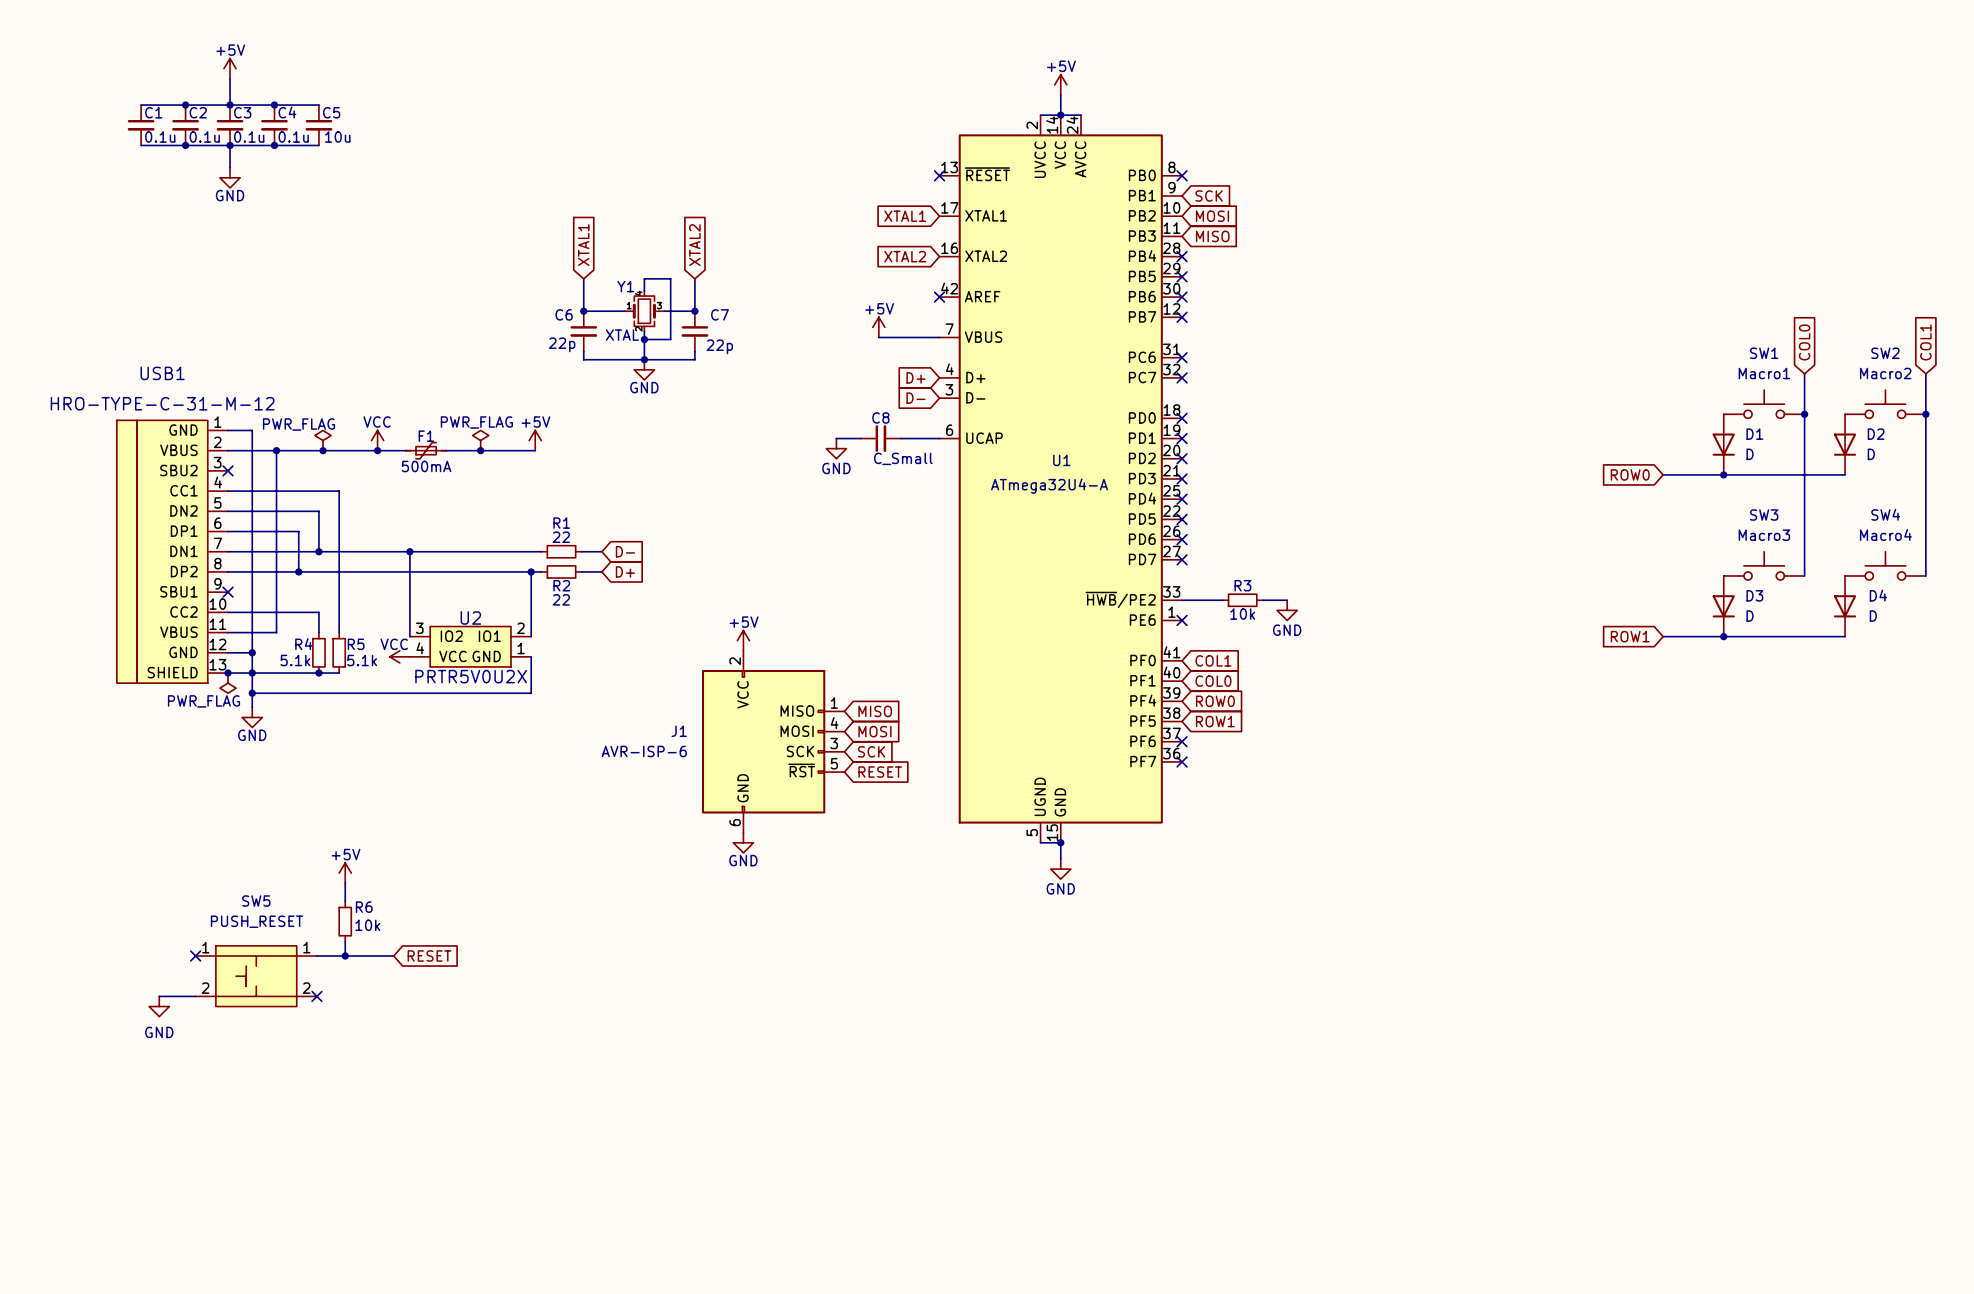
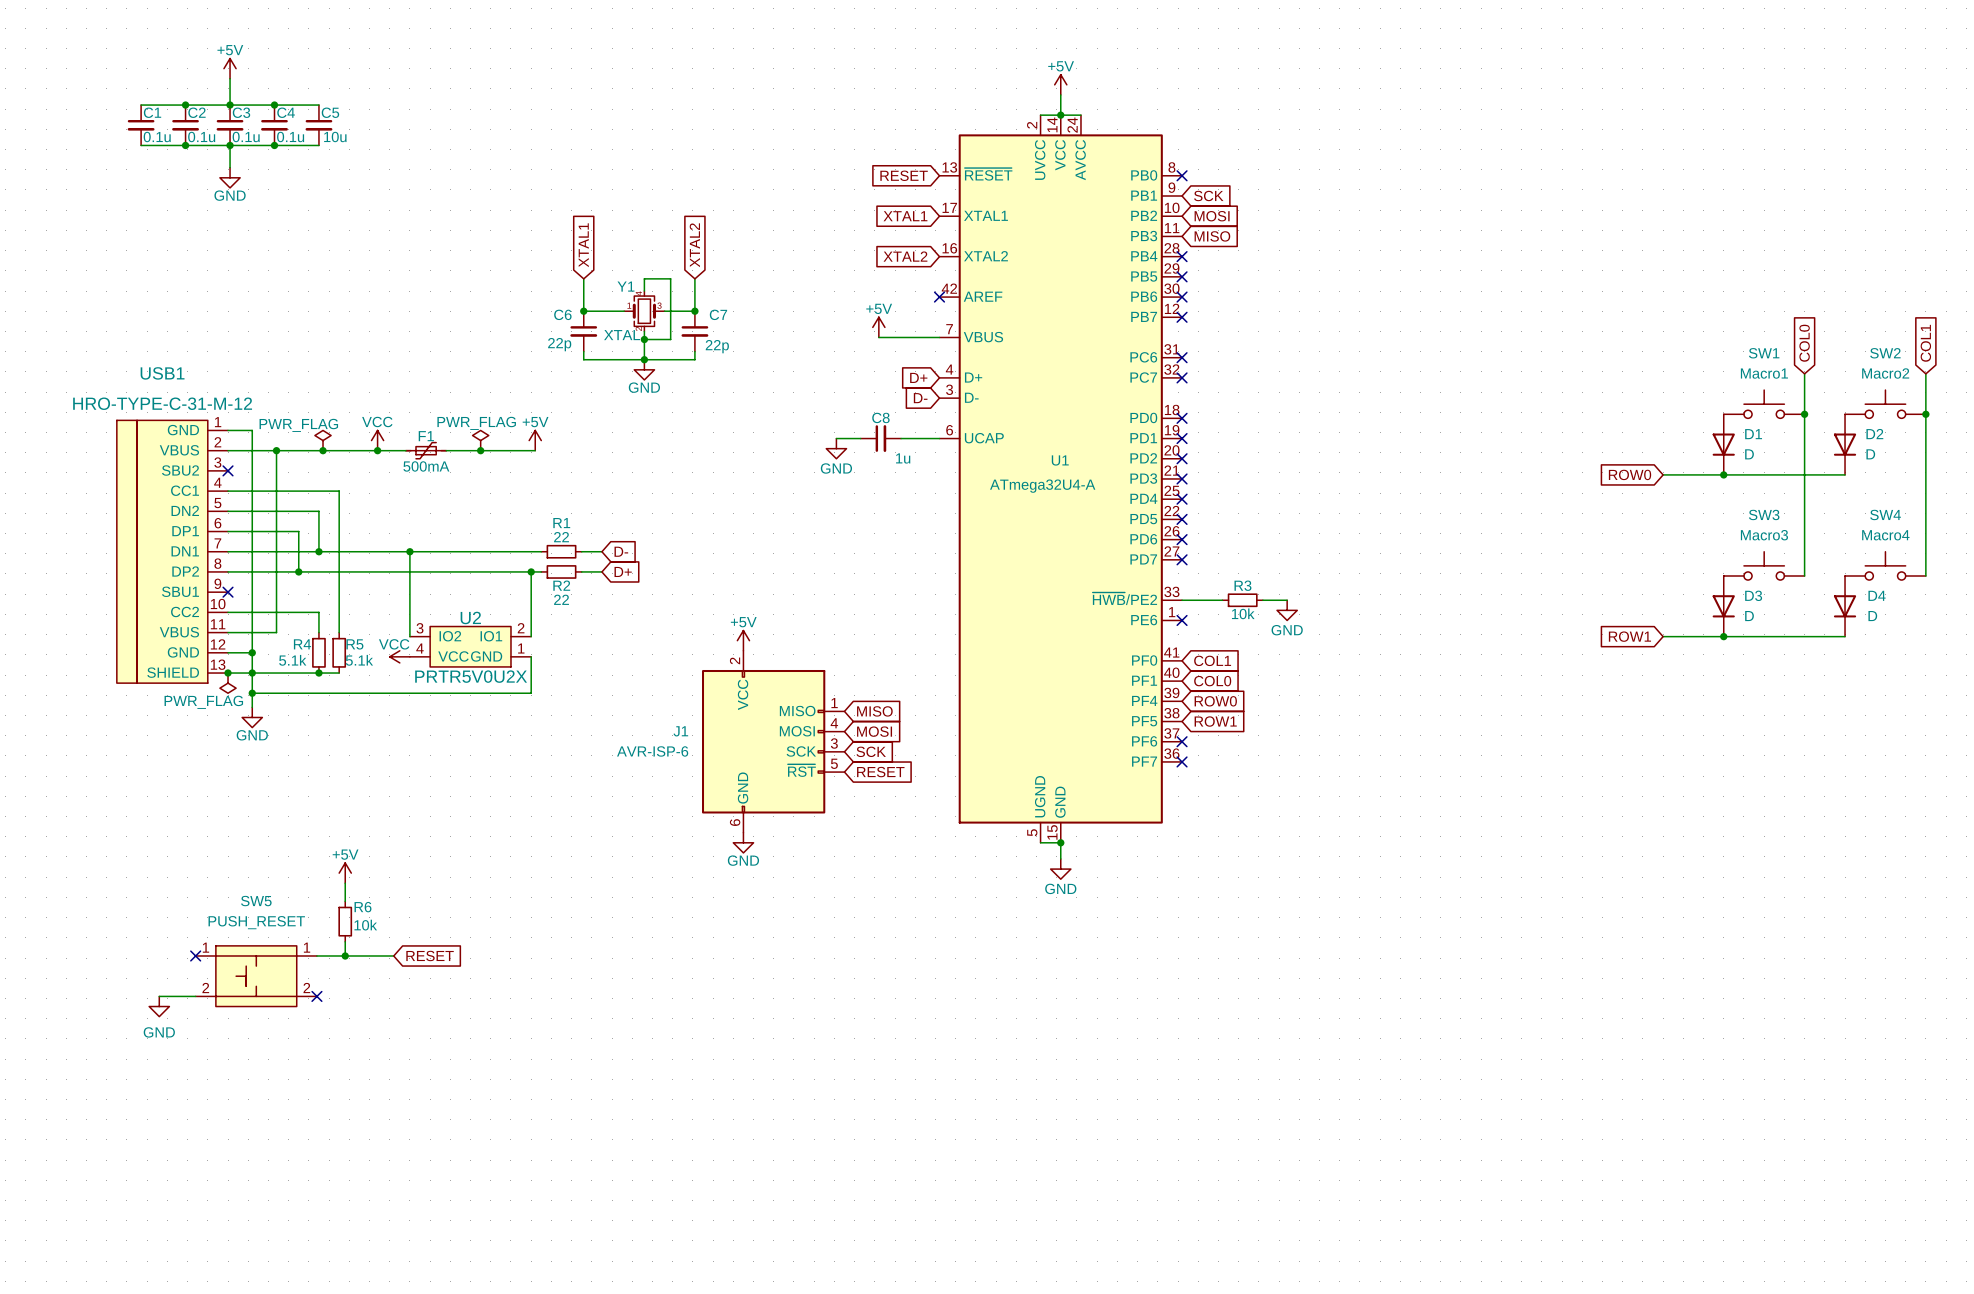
global label: none -> RESET (904, 175)
no-connect mark: (939, 175) -> none
C8 value: C_Small (903, 458) -> 1u (903, 458)

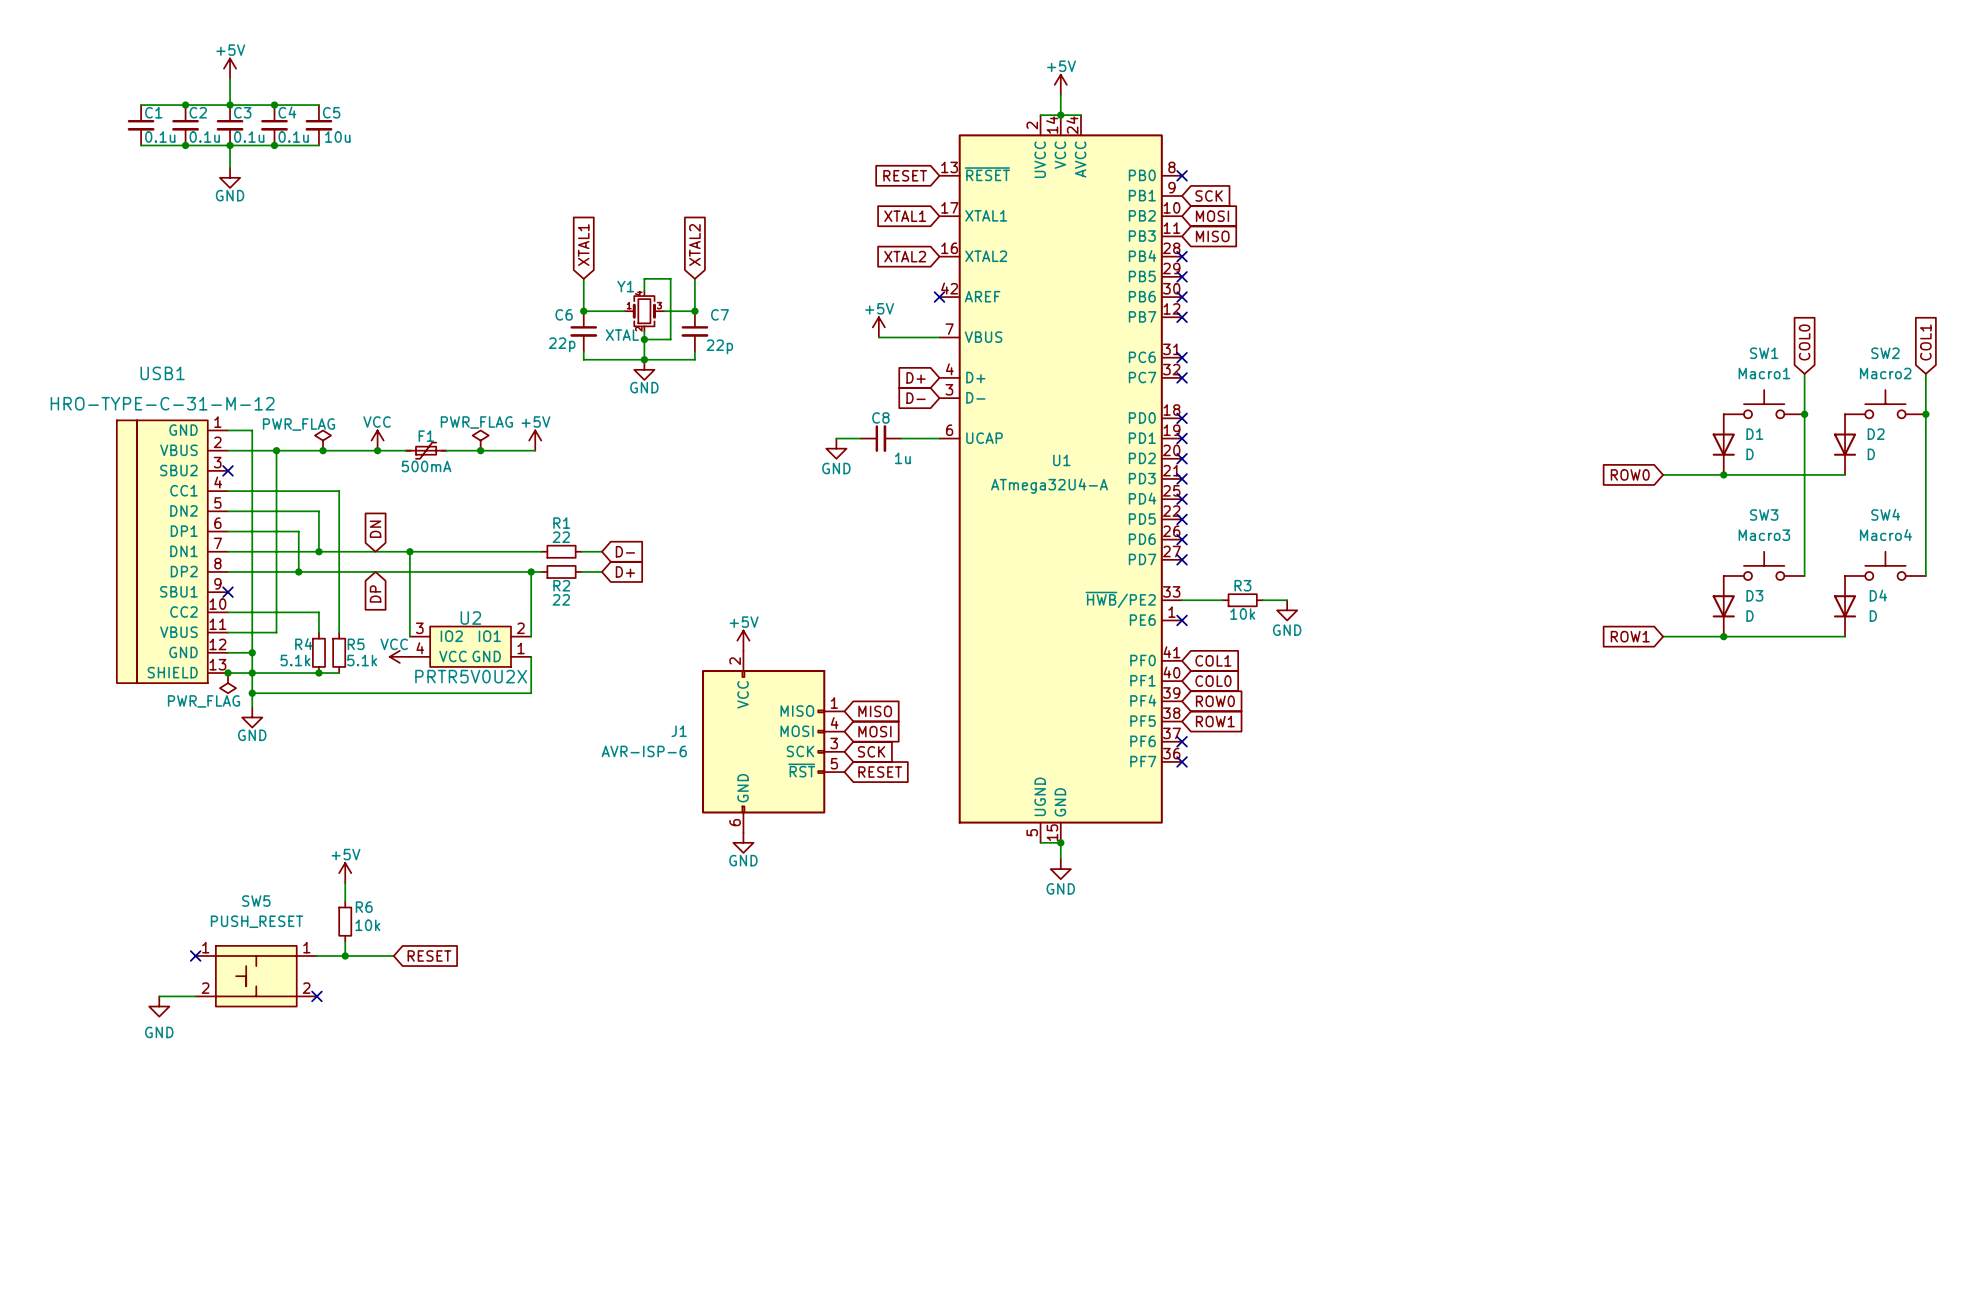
global label: none -> DN (375, 529)
global label: none -> DP (375, 593)

